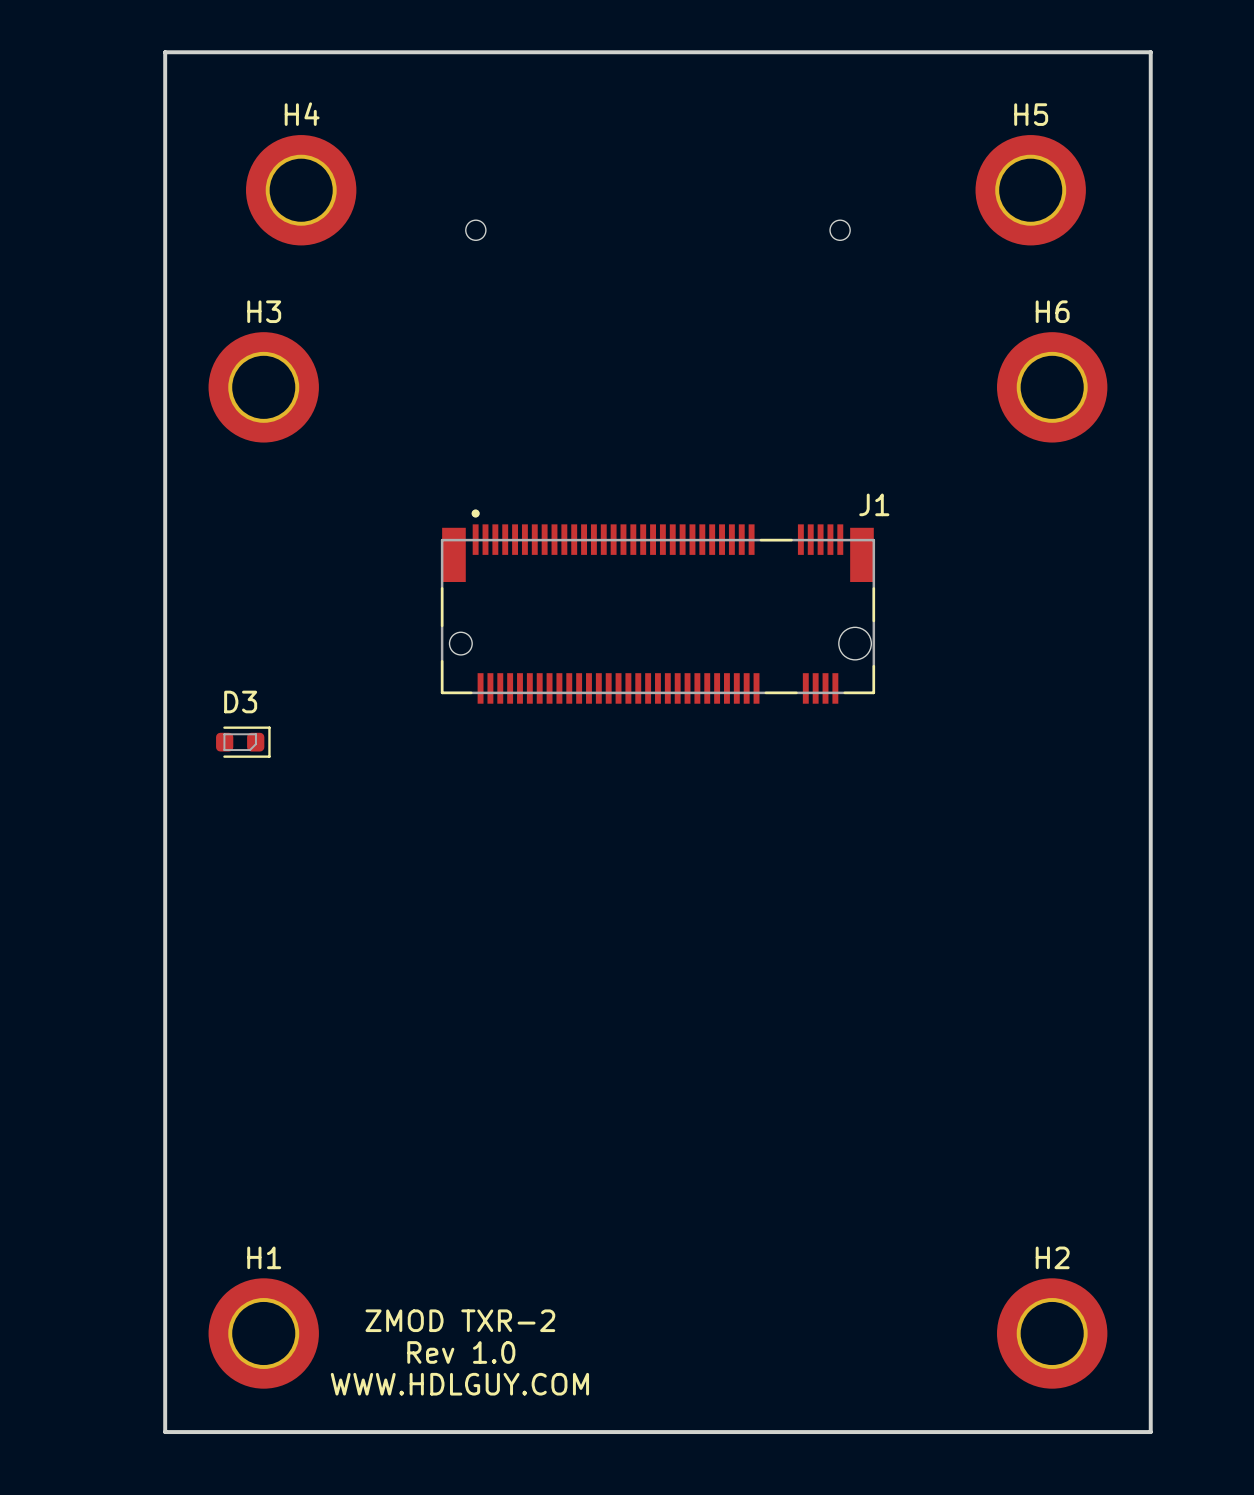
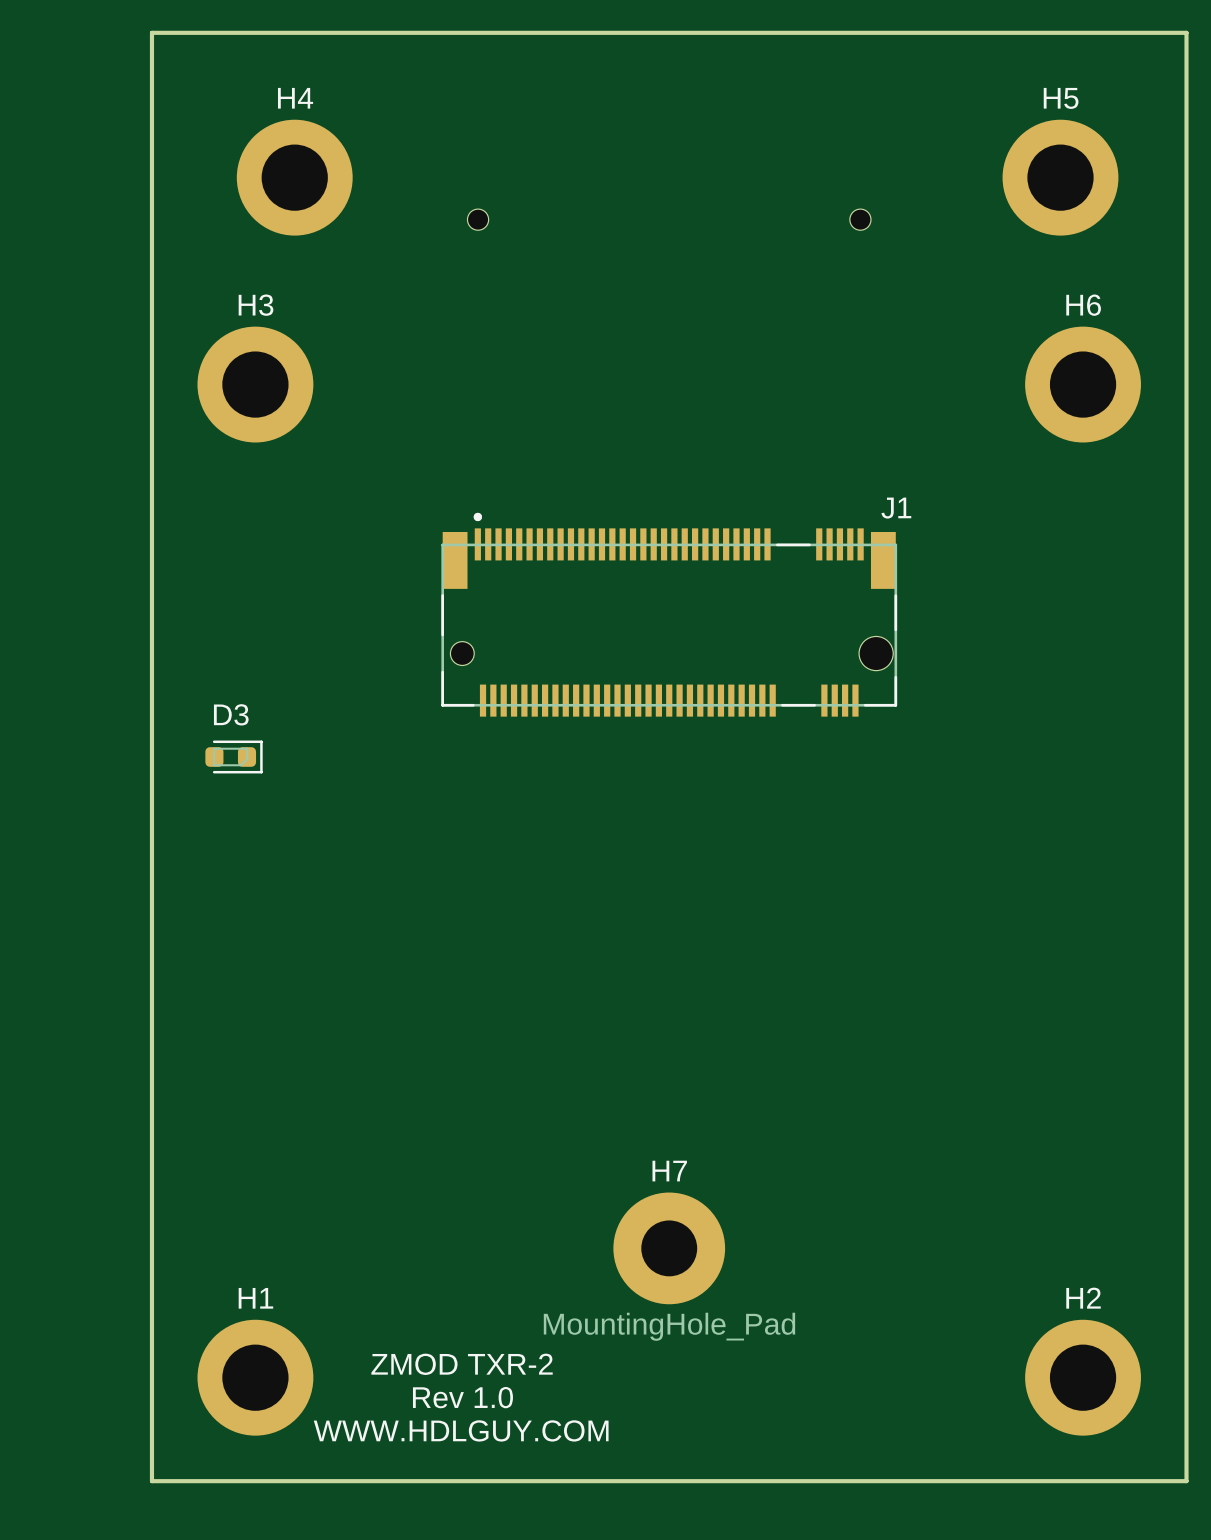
H7: none -> MountingHole_Pad (669, 1248)

